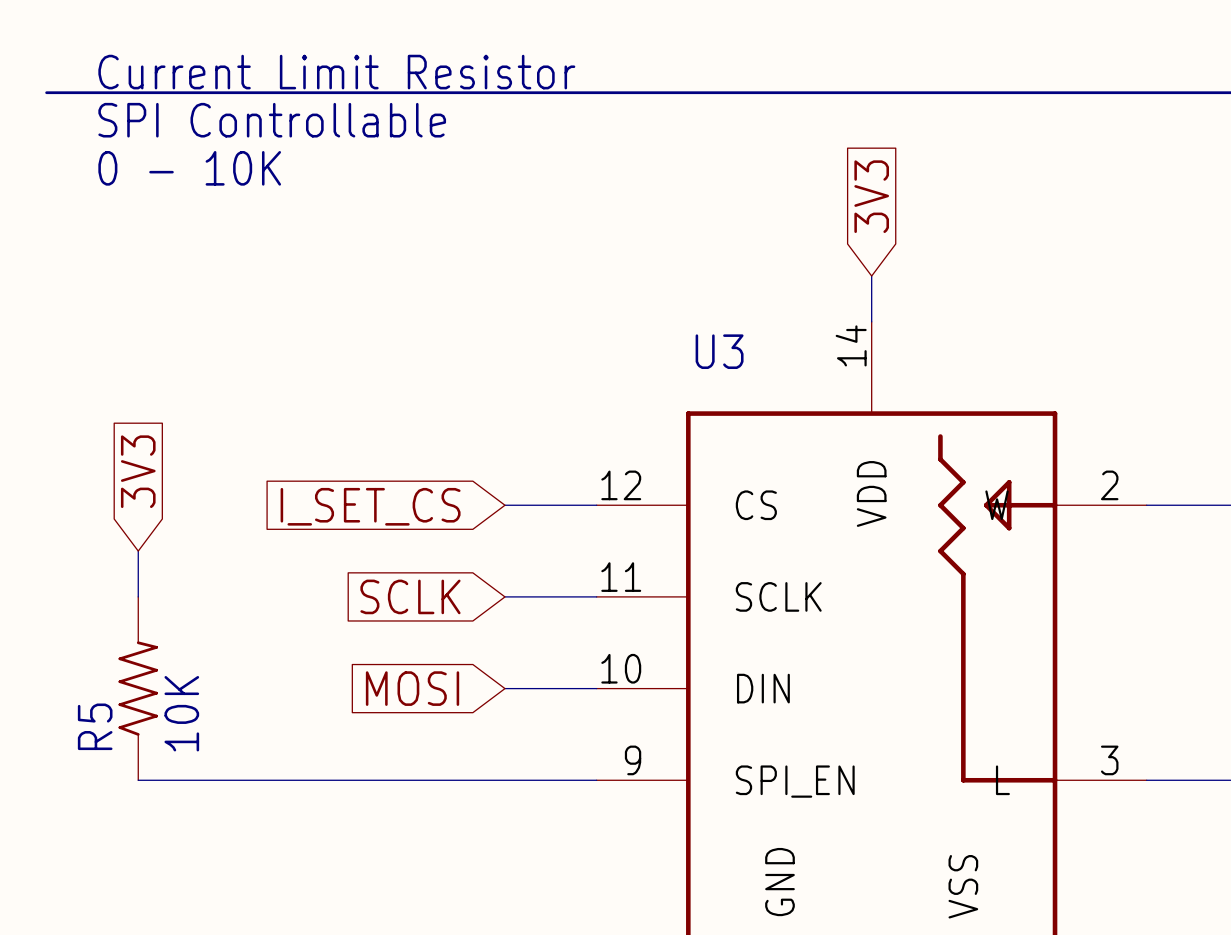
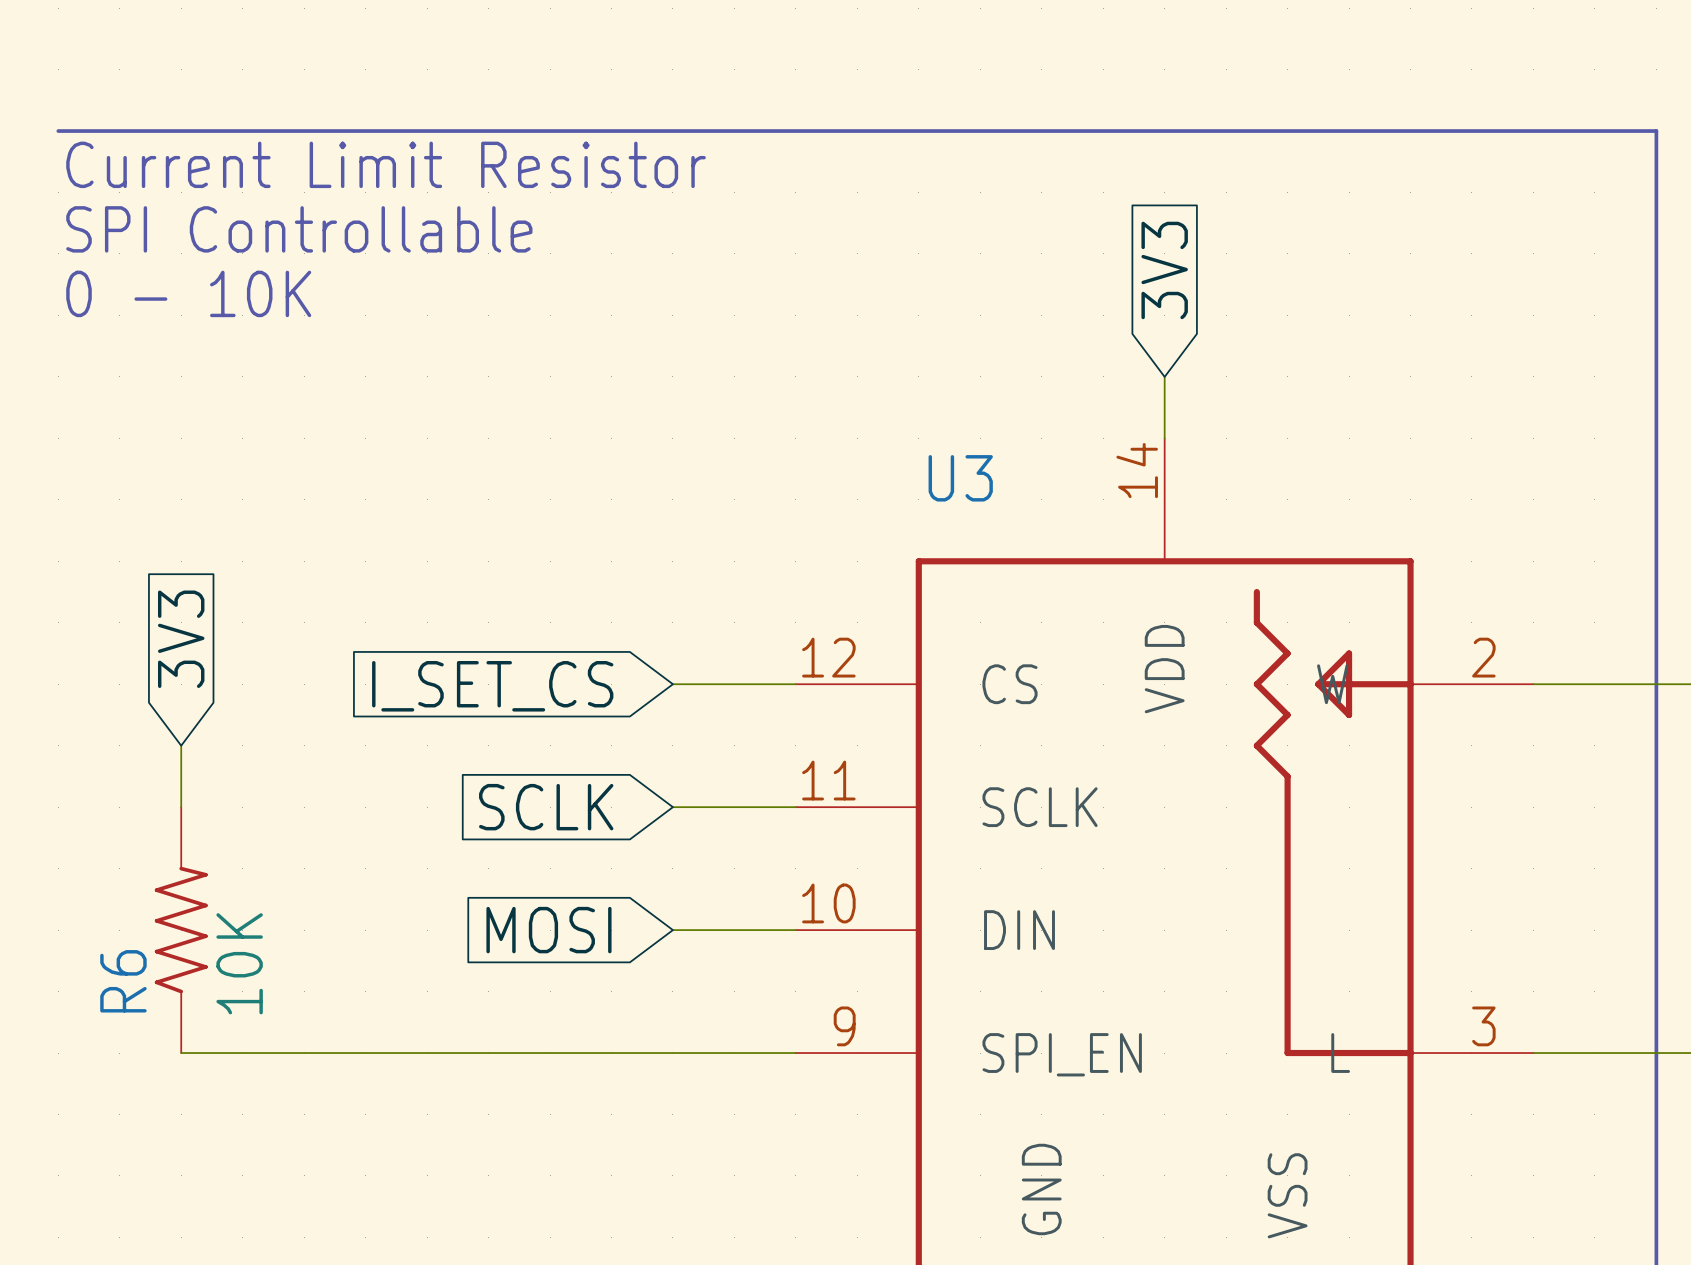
text position: Current Limit Resistor (336, 72) -> Current Limit Resistor (386, 164)
text position: SPI Controllable (272, 120) -> SPI Controllable (299, 229)
text position: 0 - 10K (189, 168) -> 0 - 10K (188, 293)
R5 name: R5 (95, 726) -> R6 (123, 981)

